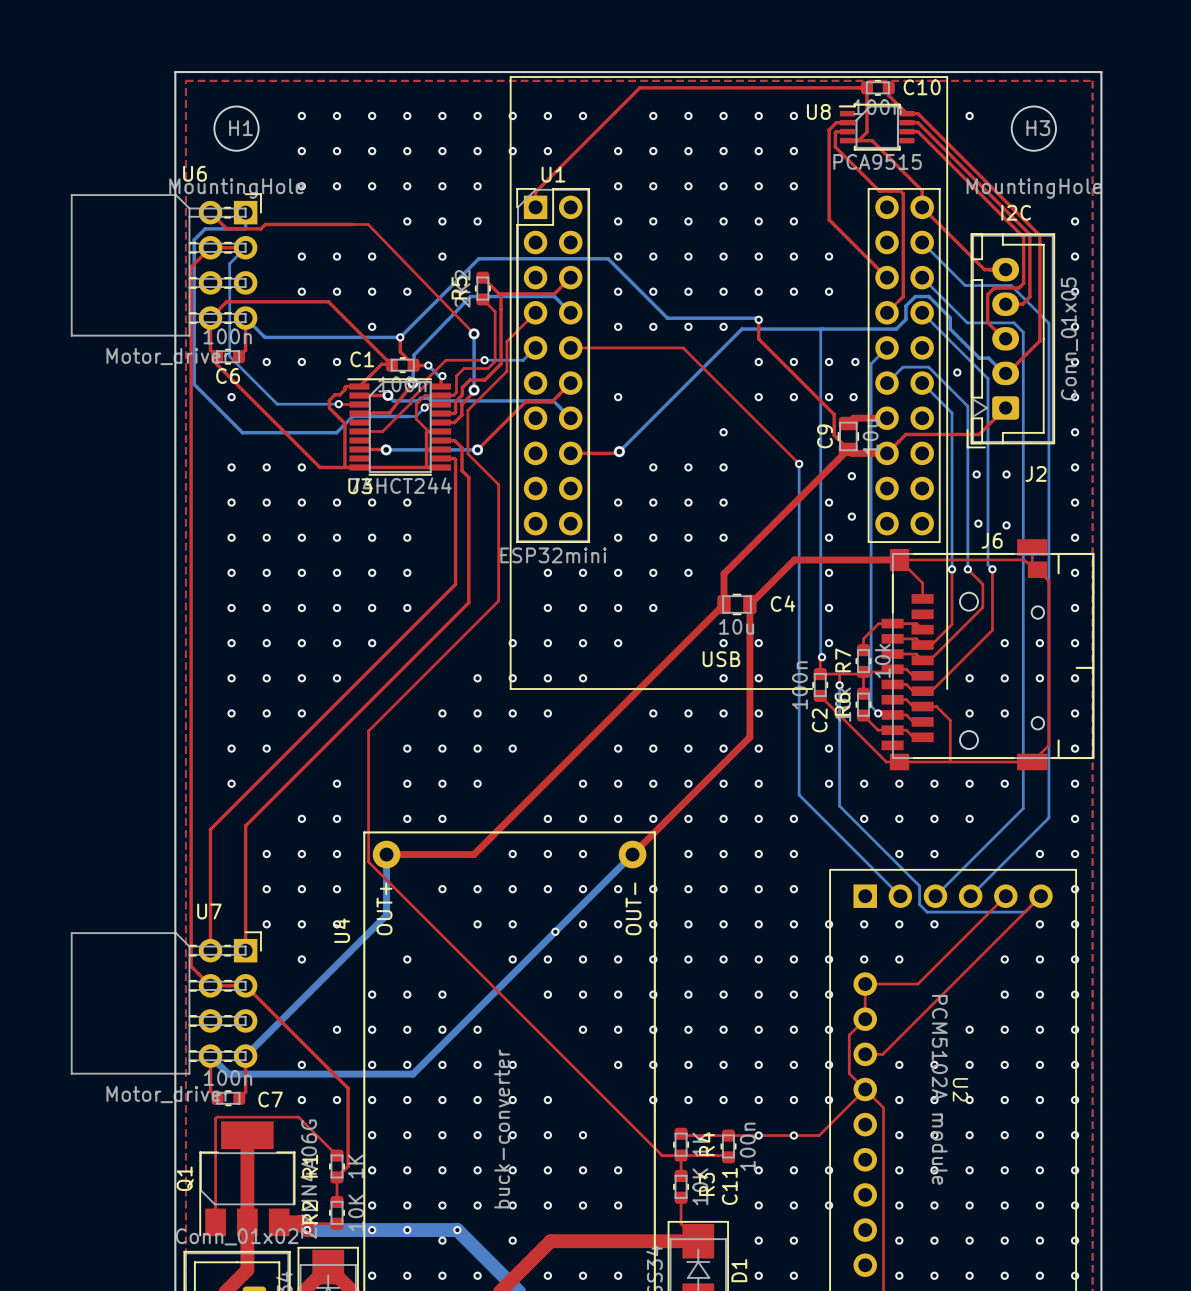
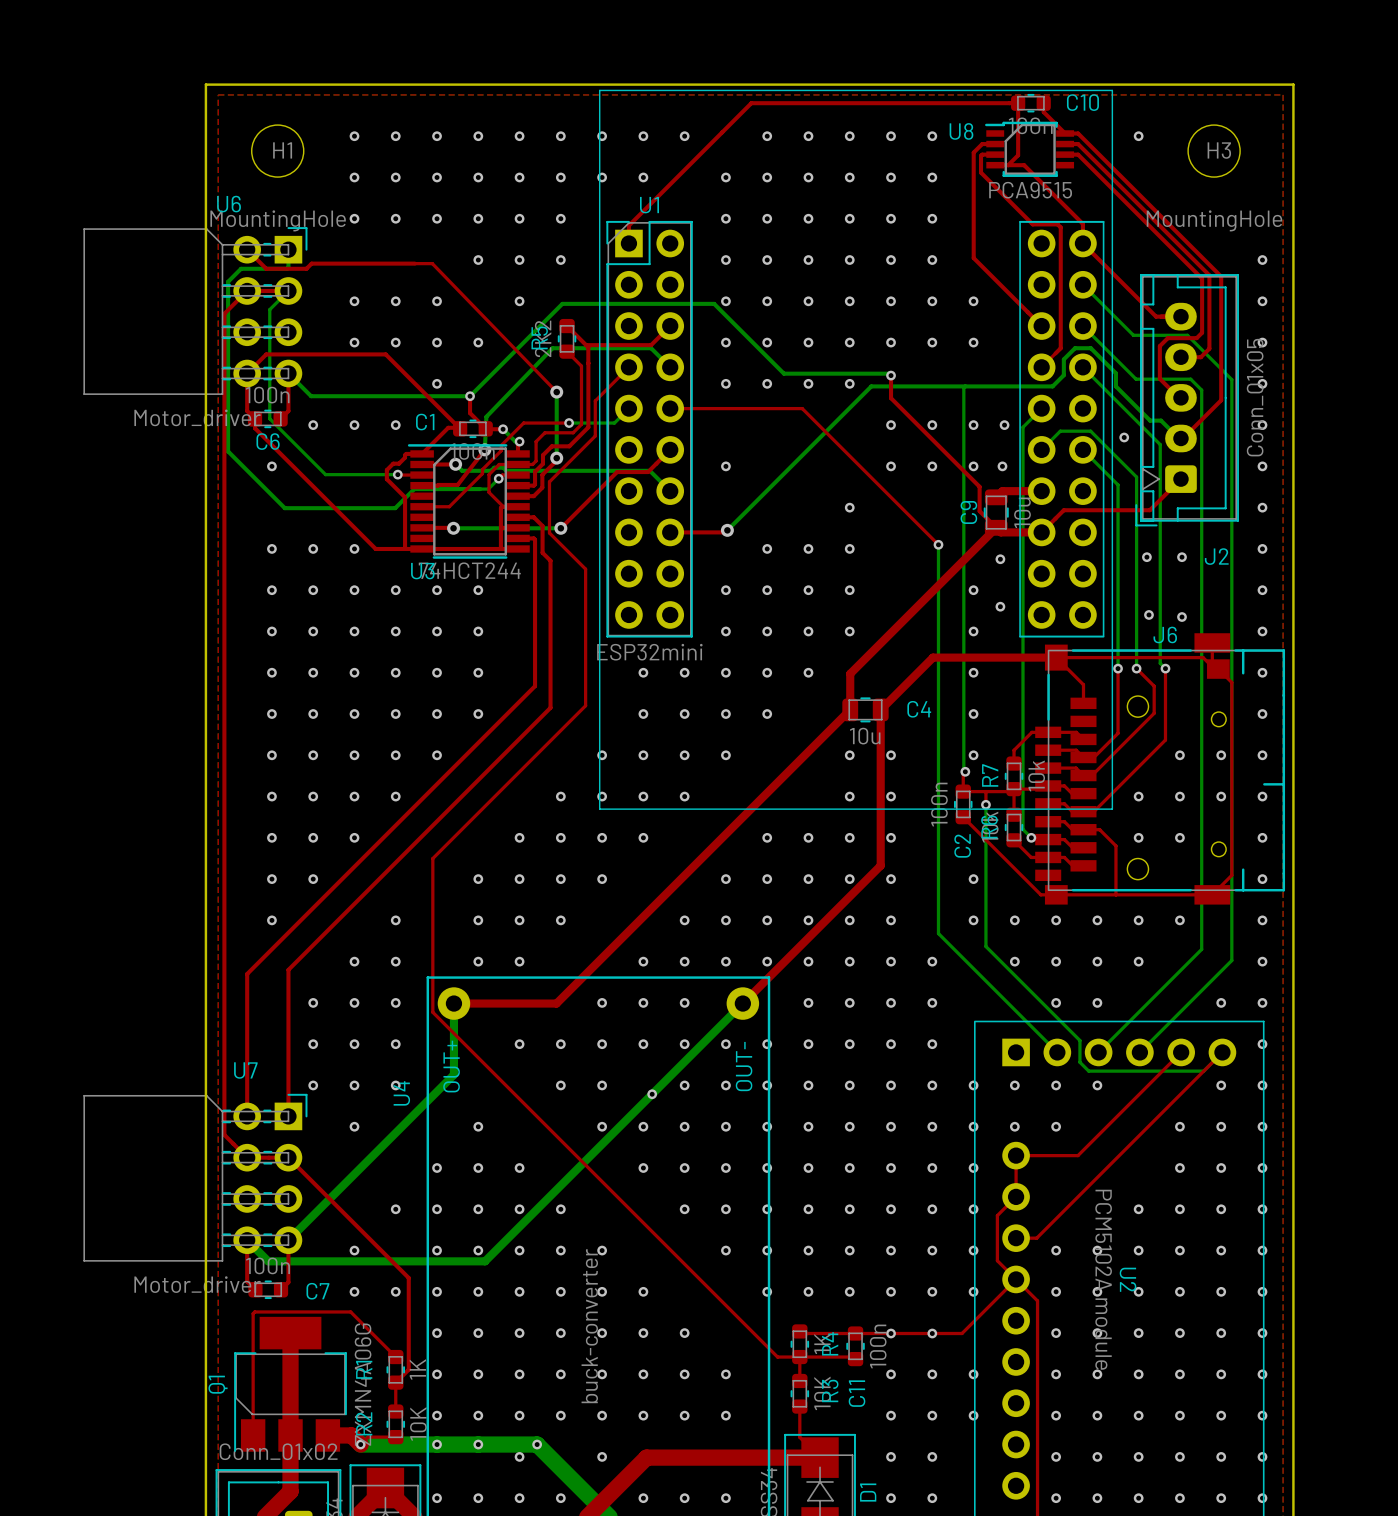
U1 footprint: [510, 76, 948, 690] -> [599, 90, 1113, 810]
text: I2C (1016, 212) -> none
text: USB (721, 659) -> none

